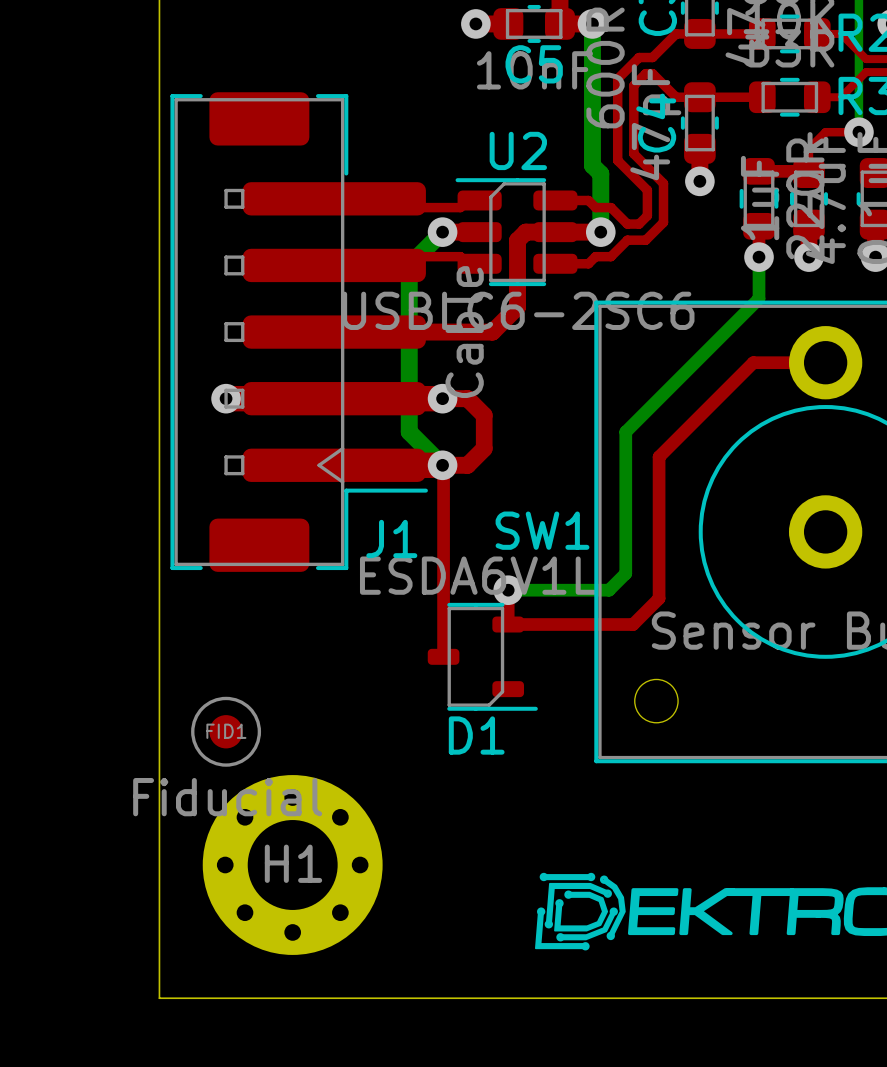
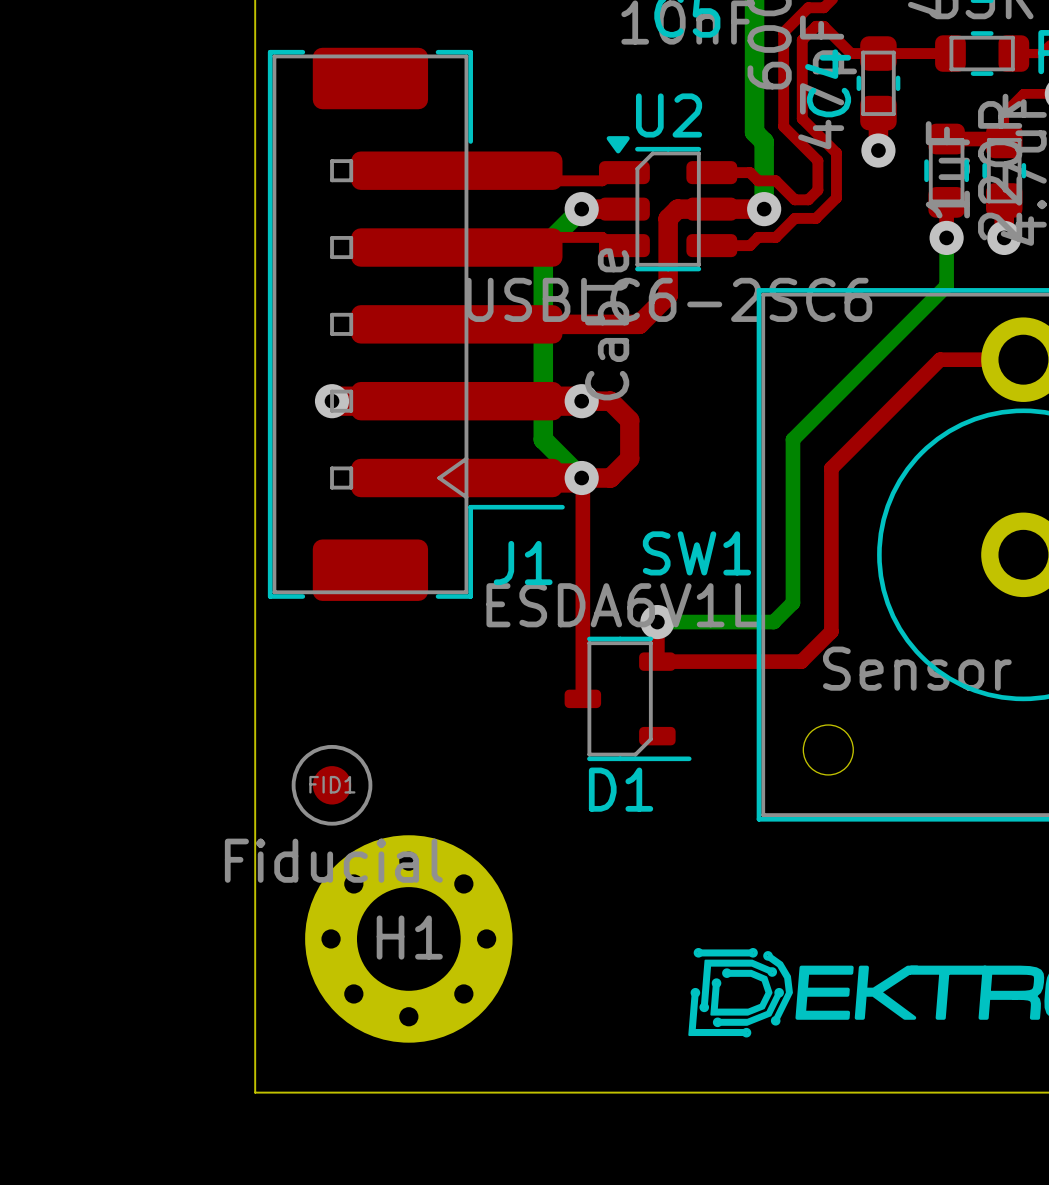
U2 footprint: [455, 178, 578, 287] -> [598, 136, 738, 272]

